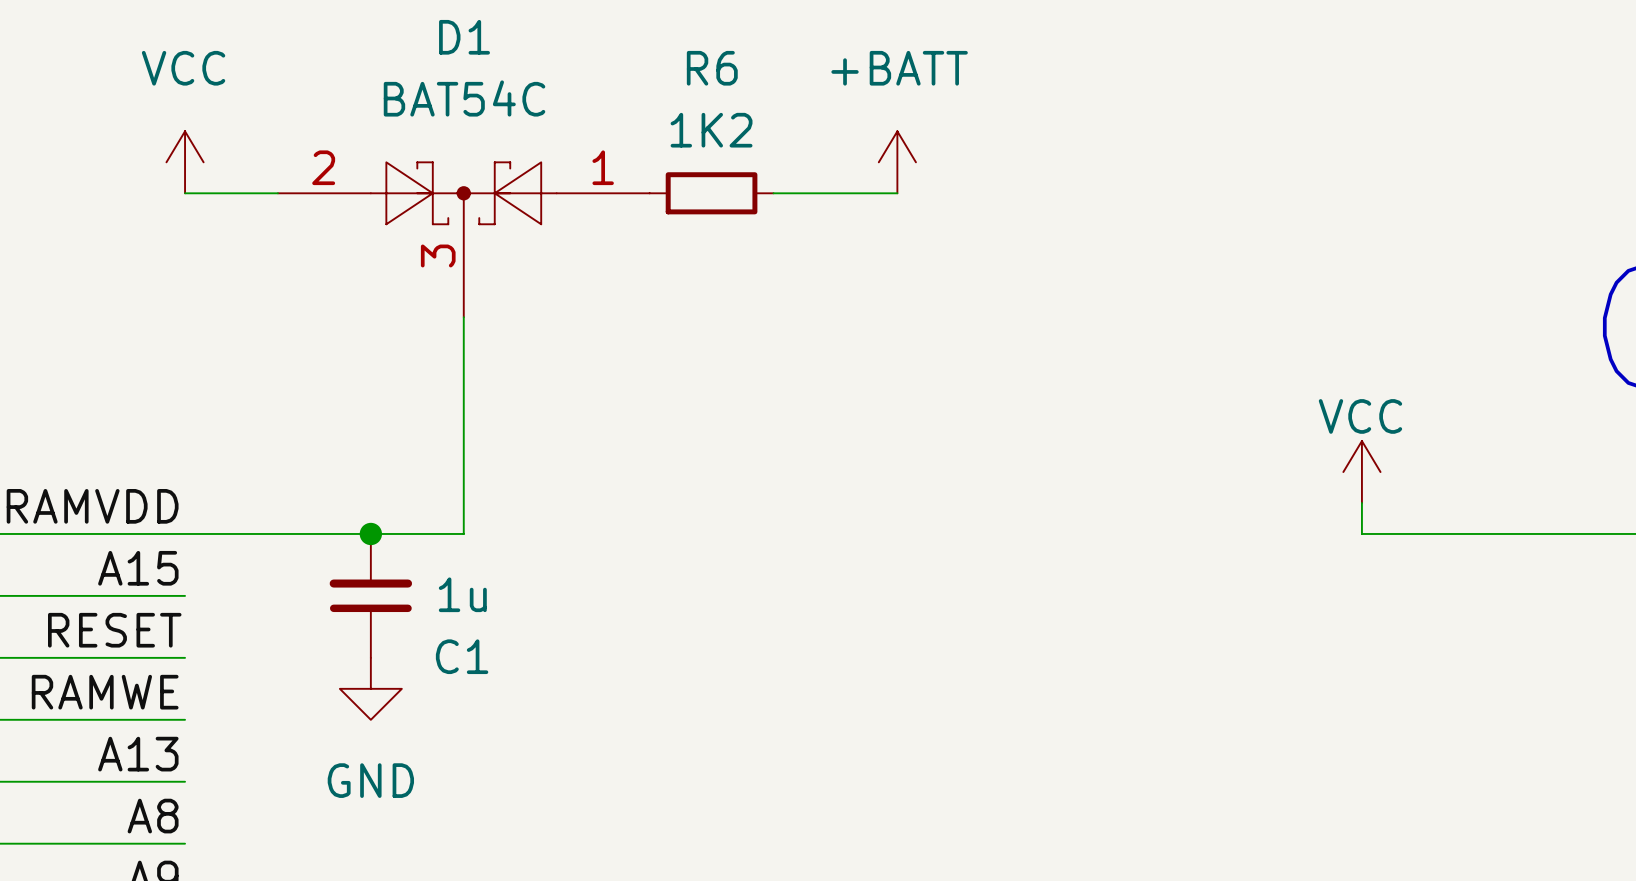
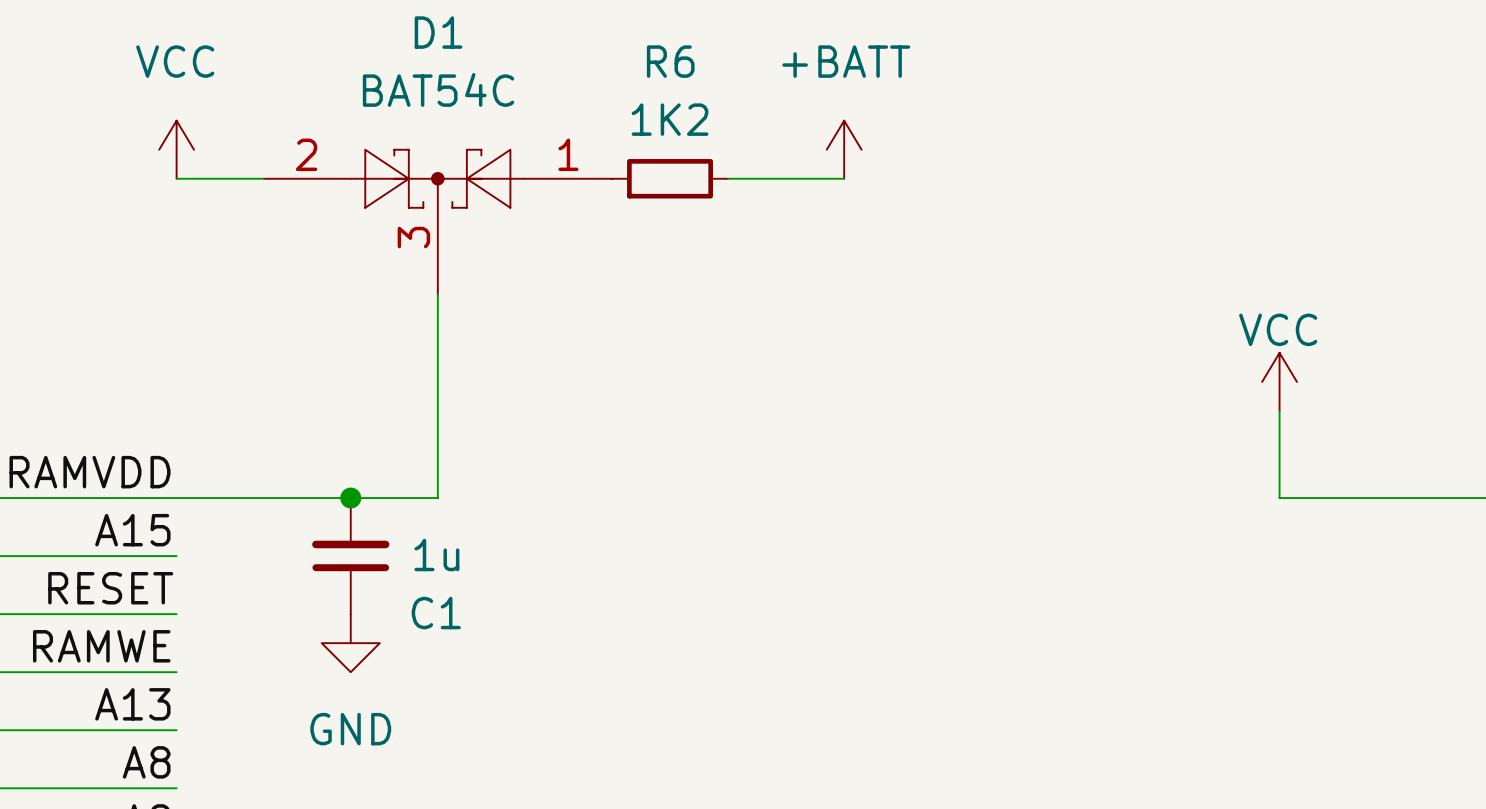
power symbol position: VCC (1361, 472) -> VCC (1279, 381)

